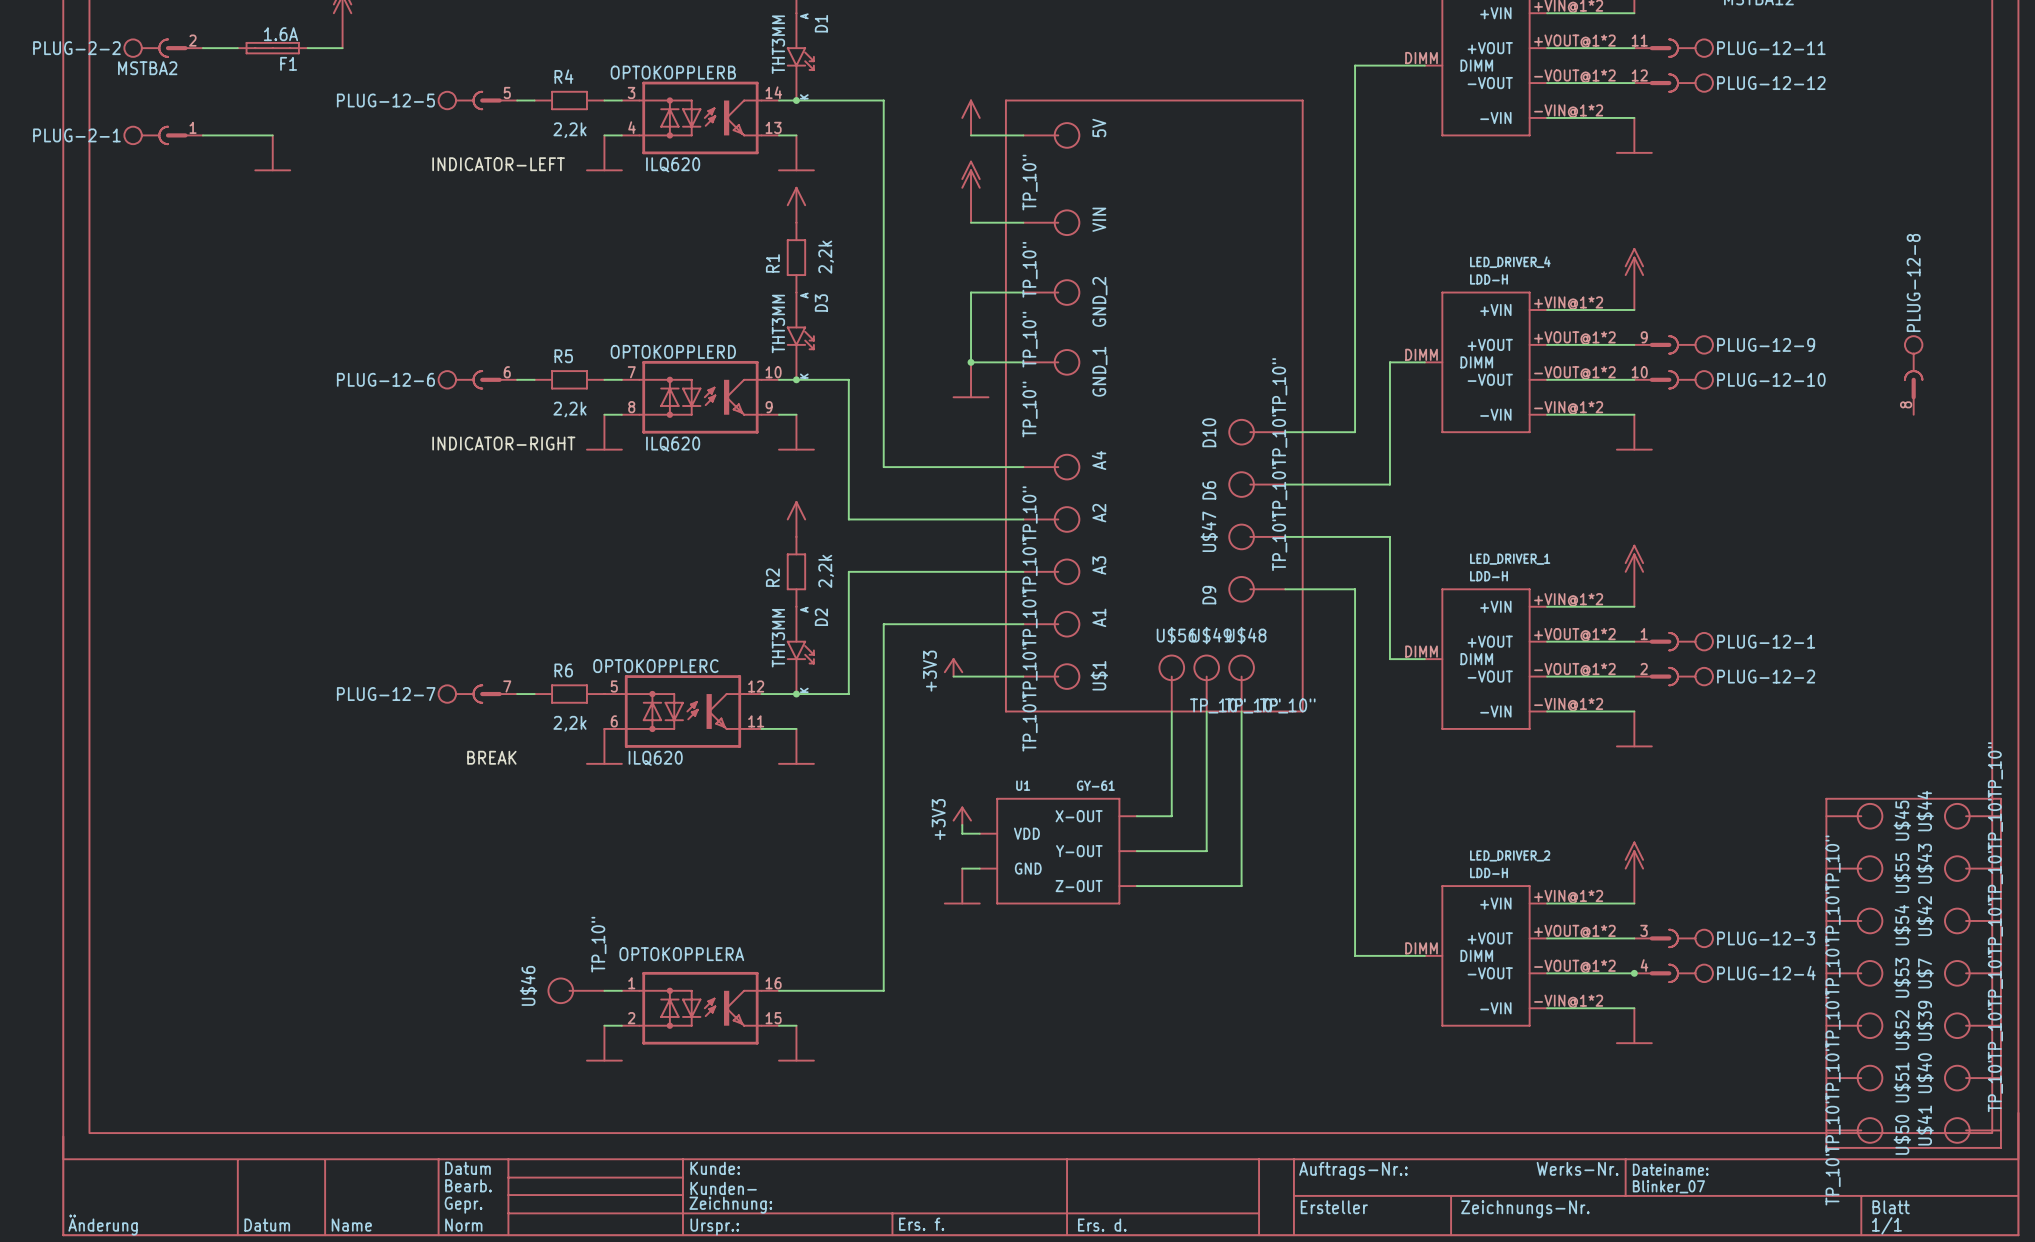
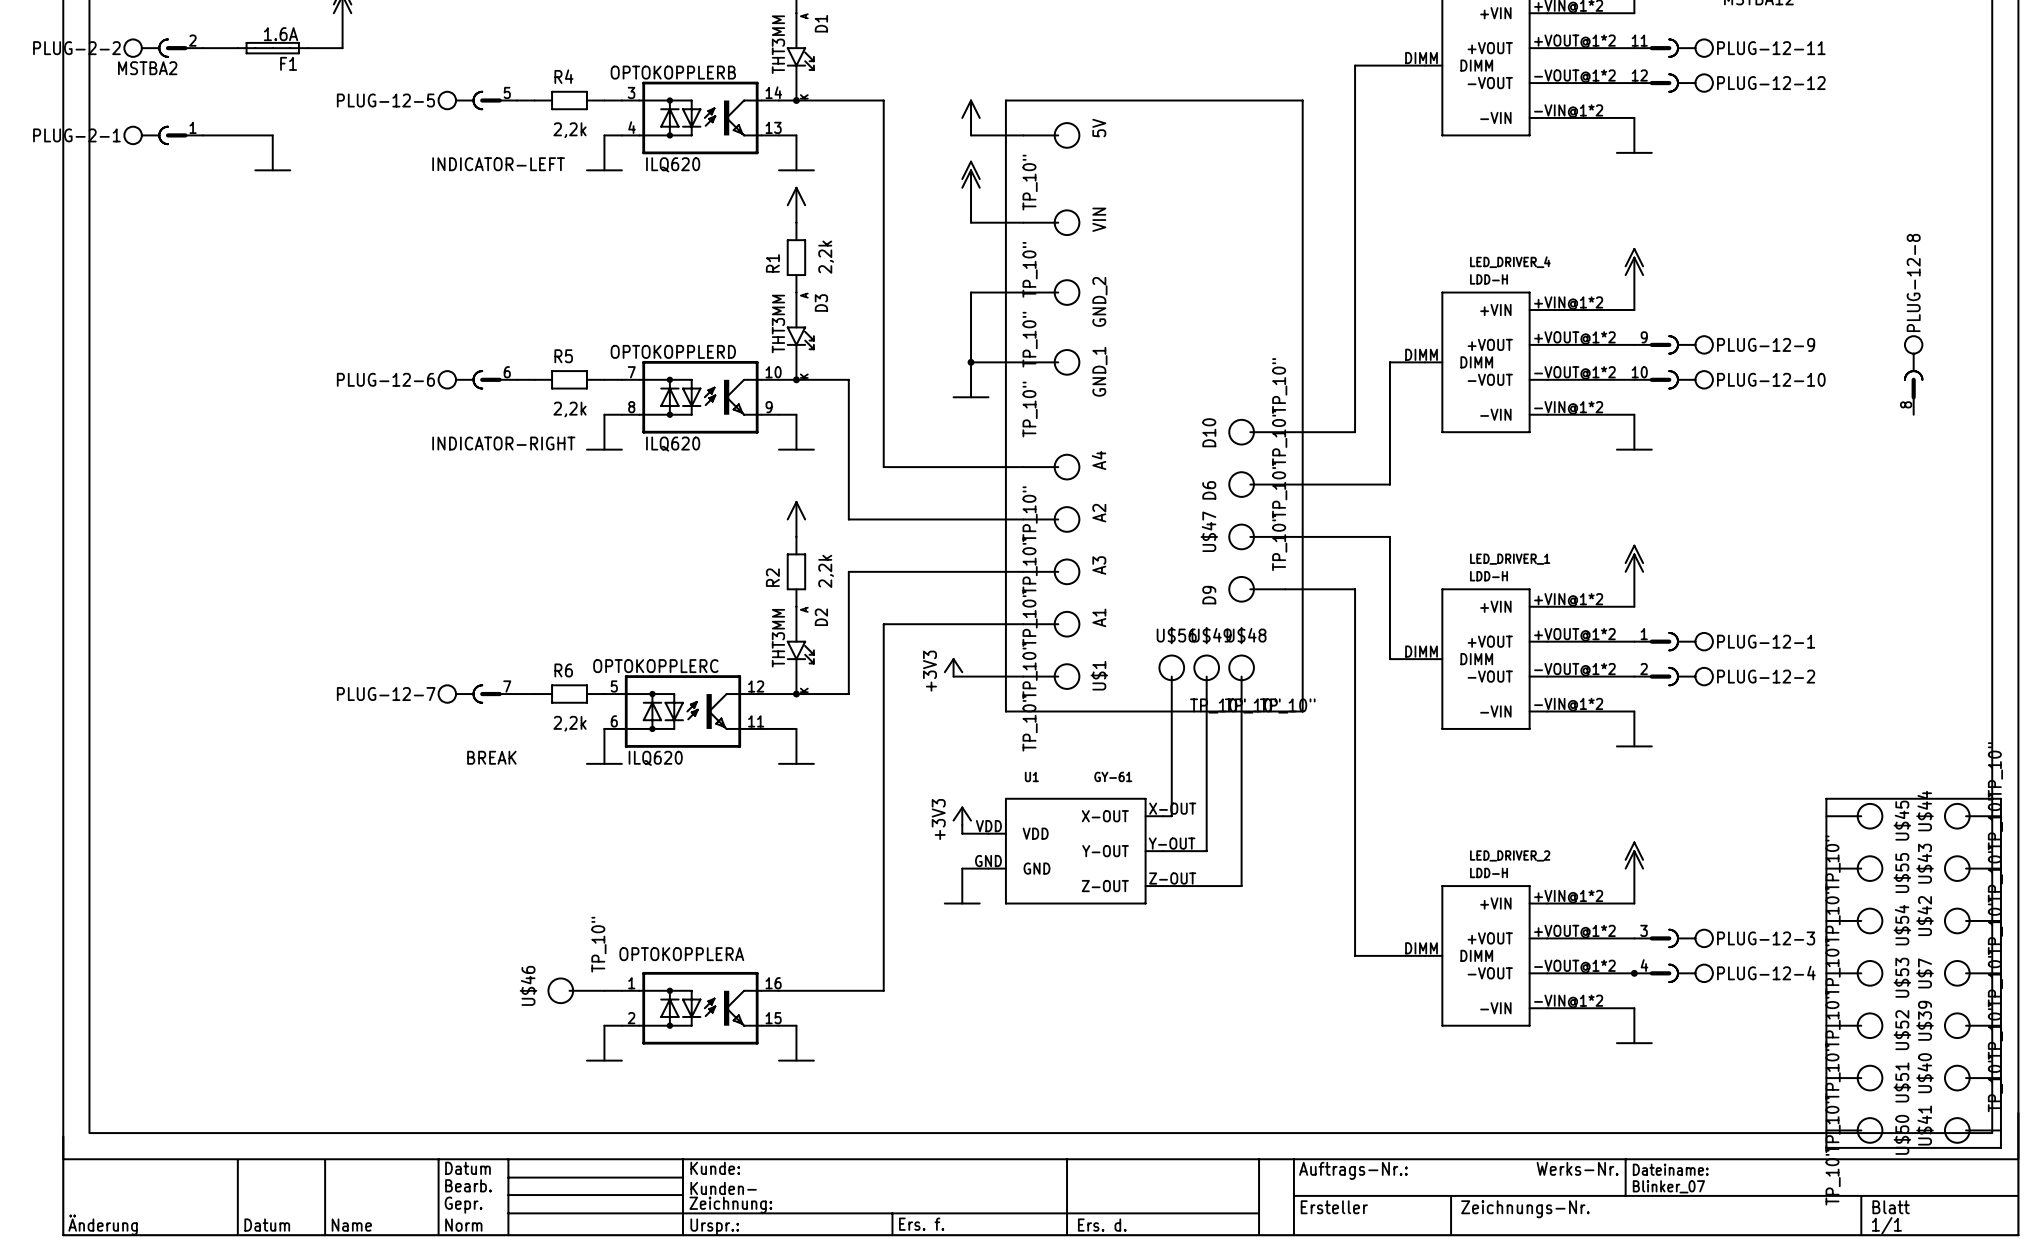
U1 symbol: [979, 797, 1137, 905] -> [988, 797, 1164, 905]

